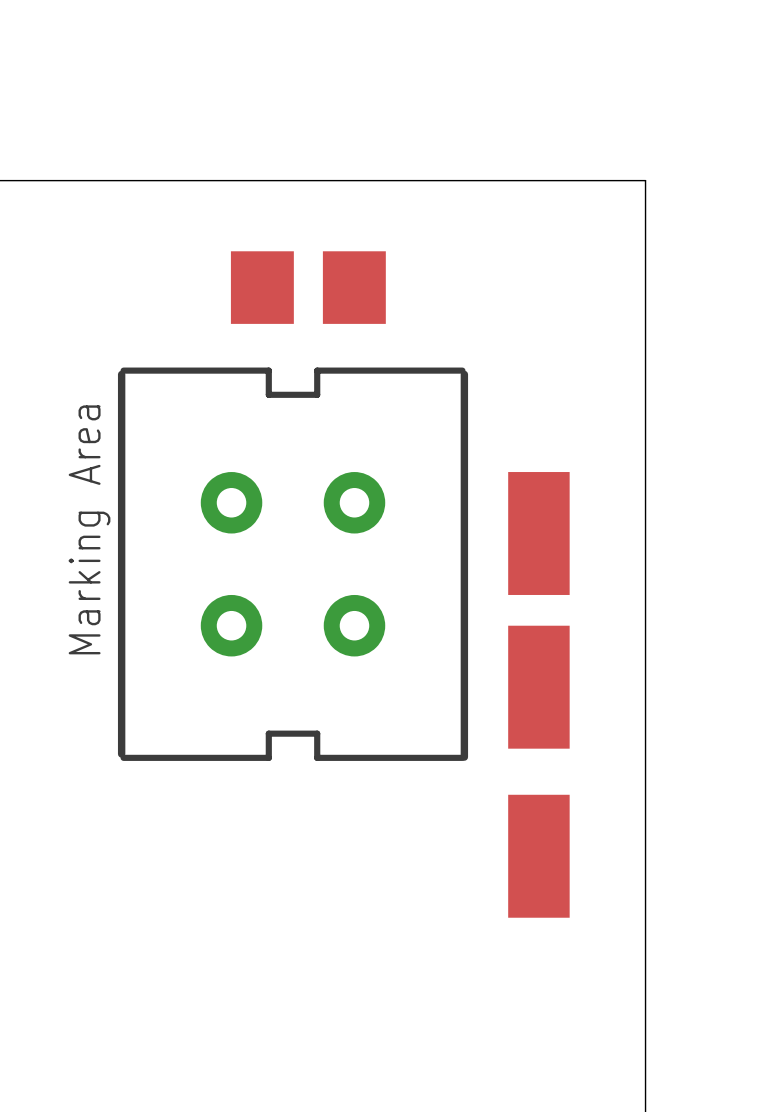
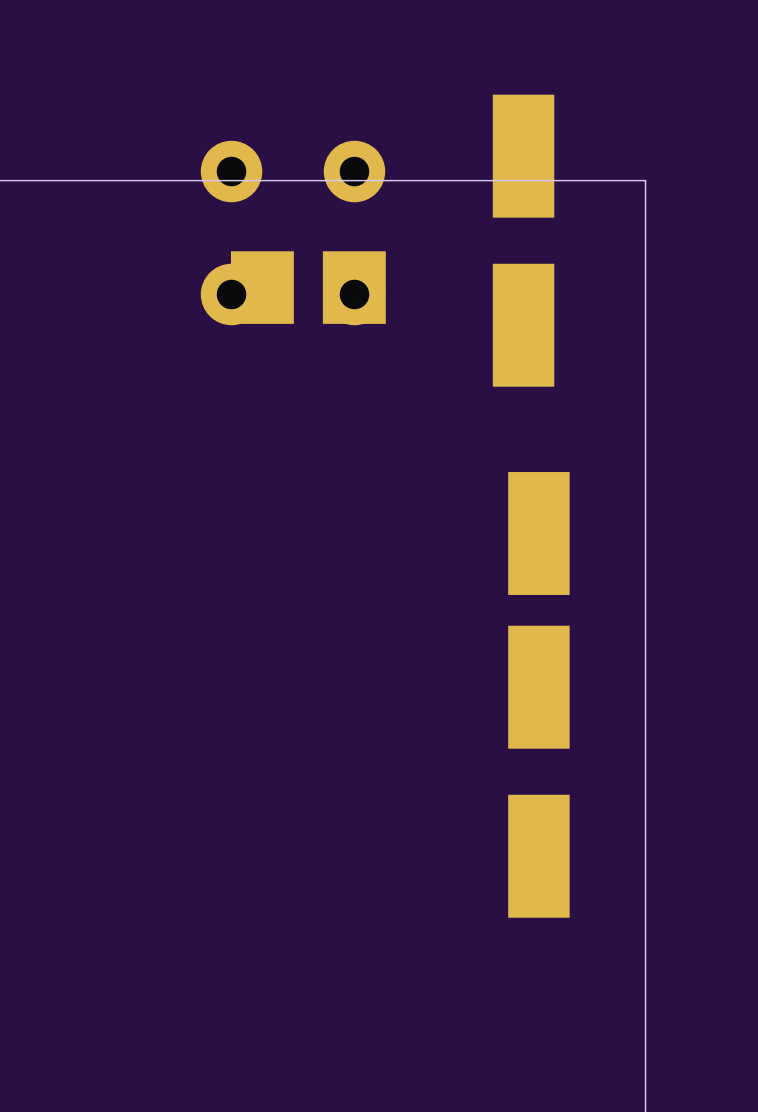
part: none -> (523, 156)
part: none -> (523, 325)
part side: top (293, 564) -> bottom (293, 233)

